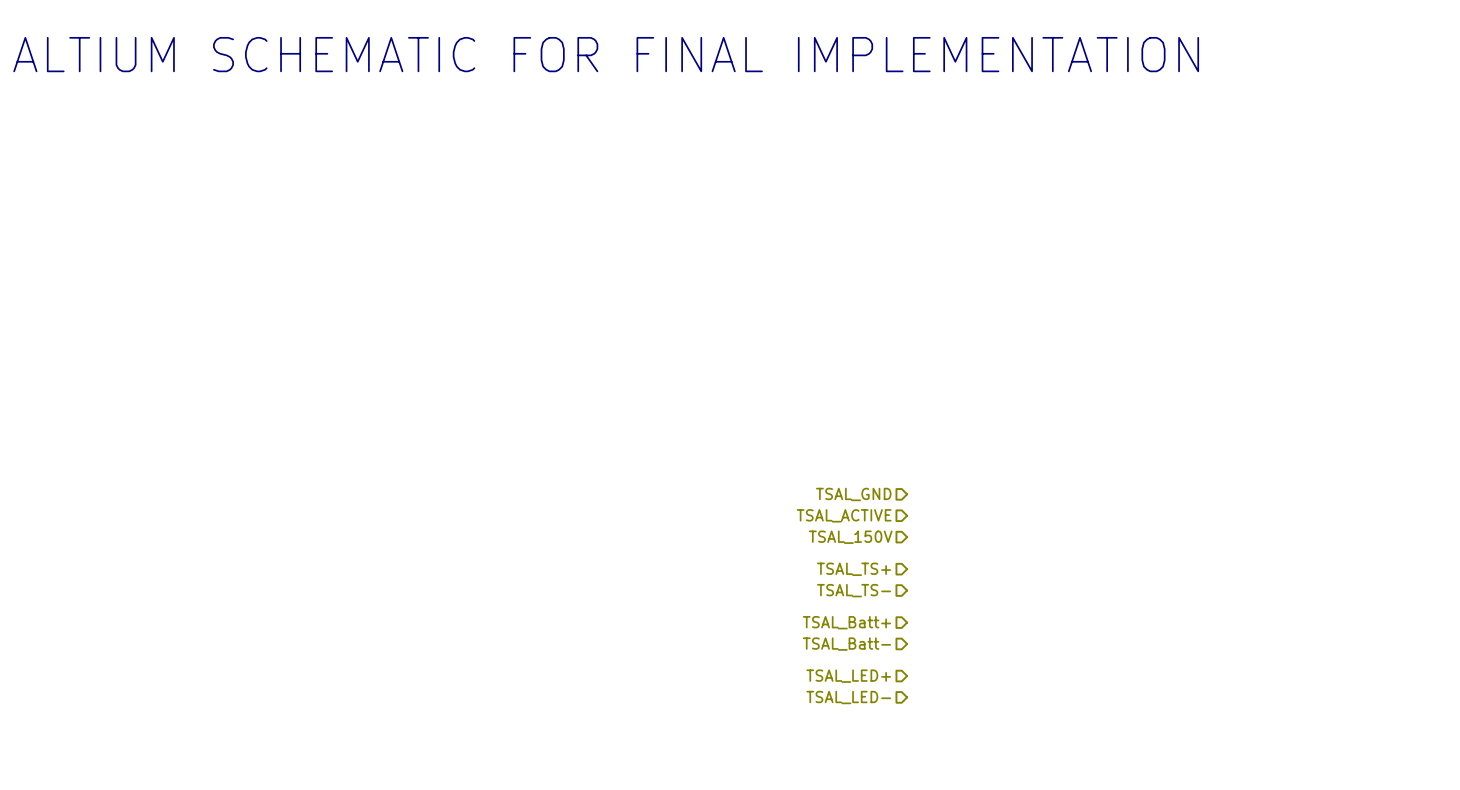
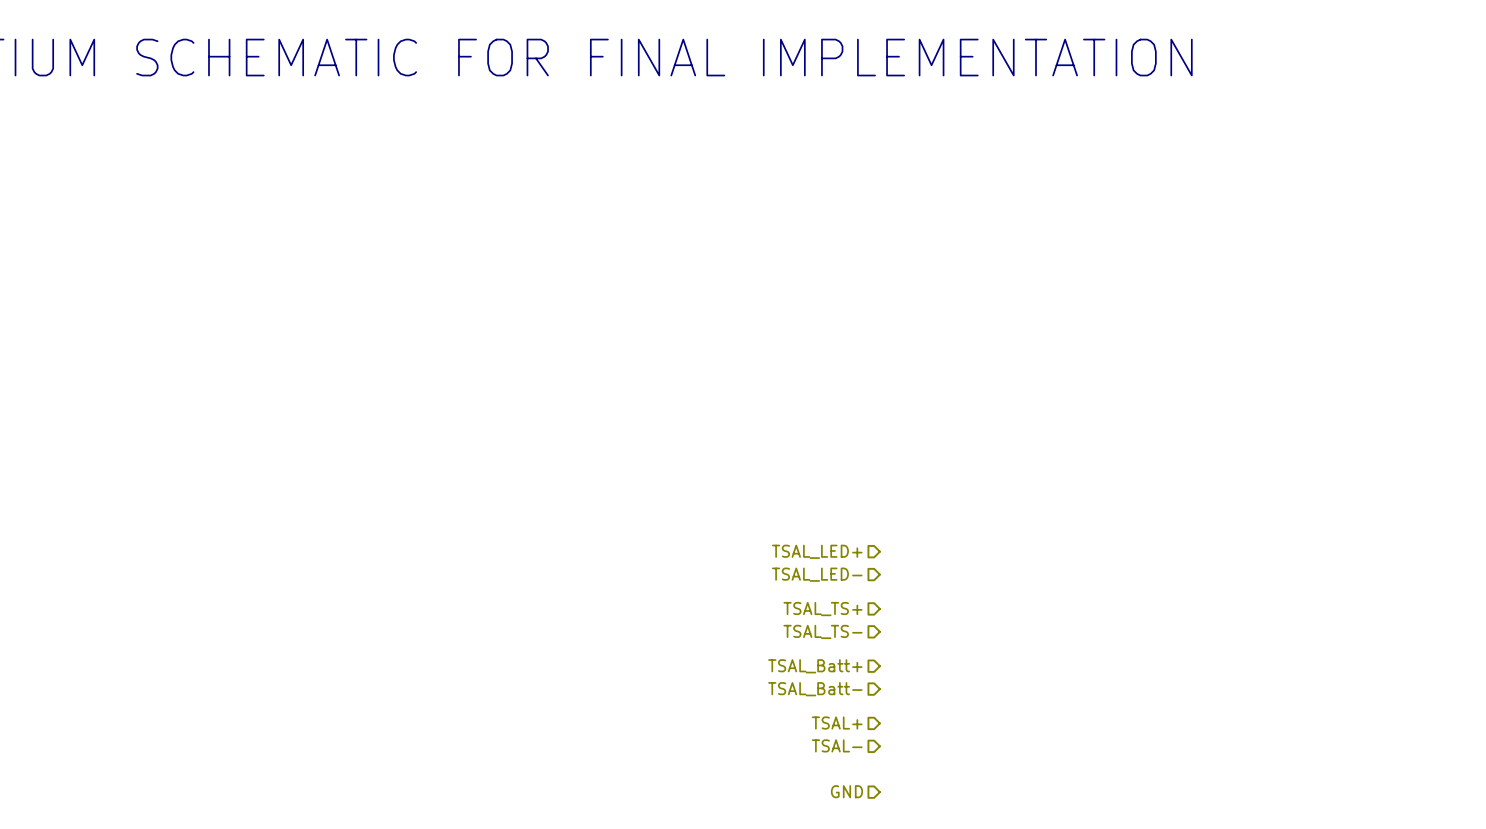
hierarchical label: TSAL_GND (853, 494) -> none
hierarchical label: TSAL_ACTIVE (844, 515) -> TSAL_LED+ (817, 551)
hierarchical label: TSAL_150V (850, 537) -> TSAL_LED- (817, 574)
hierarchical label: TSAL_LED+ (848, 676) -> TSAL+ (837, 723)
hierarchical label: TSAL_LED- (848, 697) -> TSAL- (837, 745)
hierarchical label: none -> GND (846, 791)

